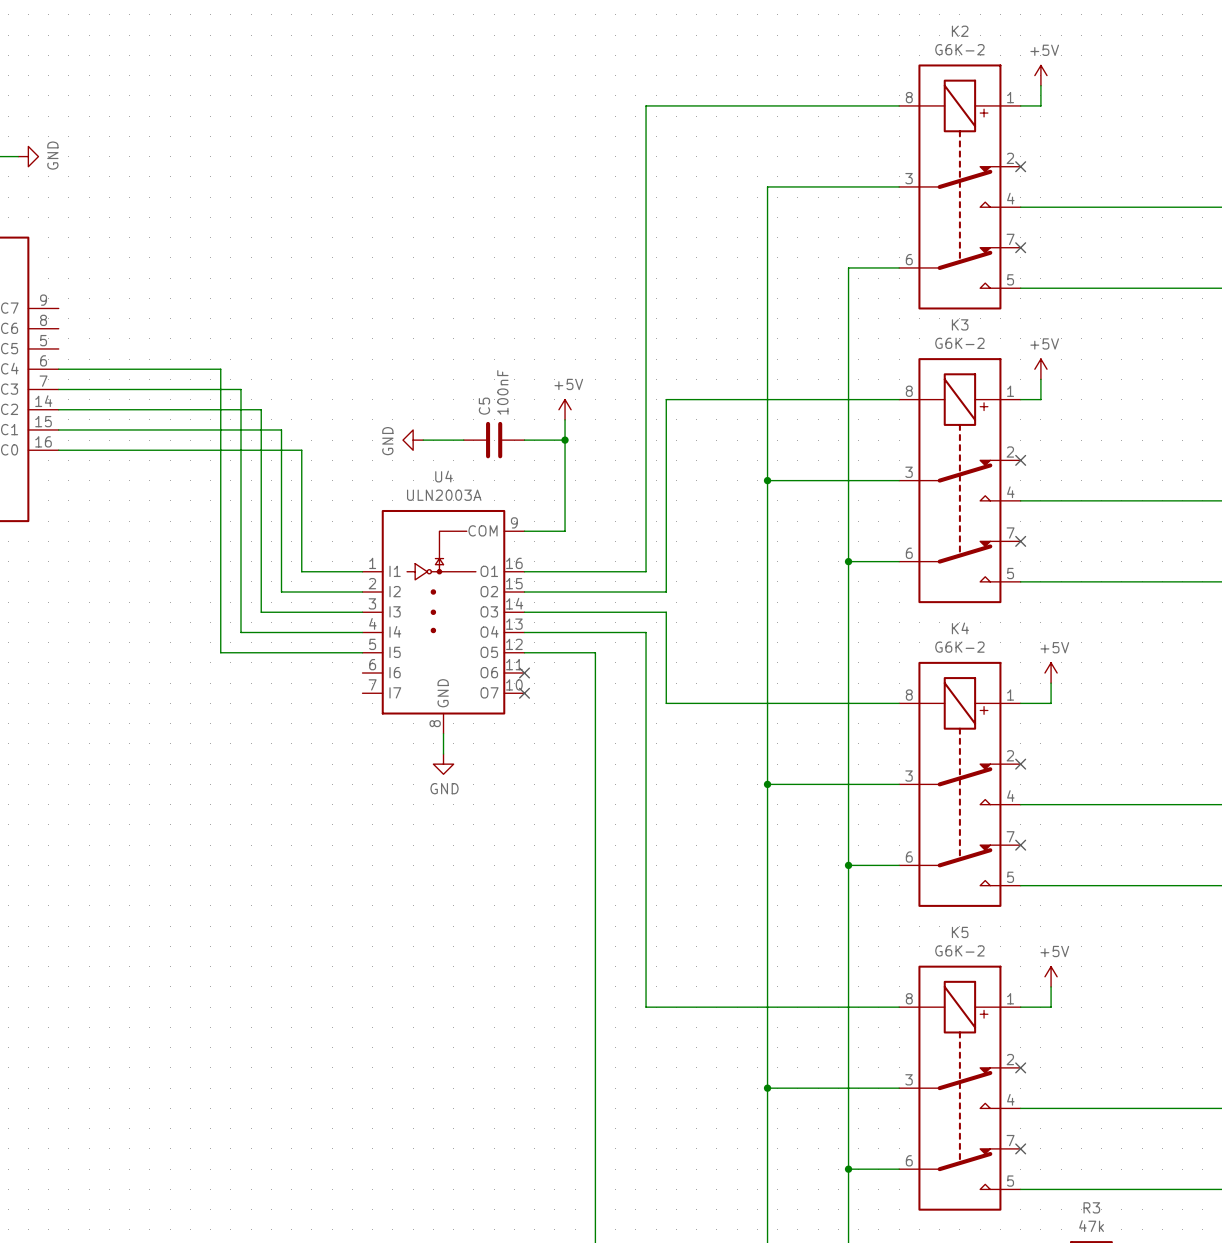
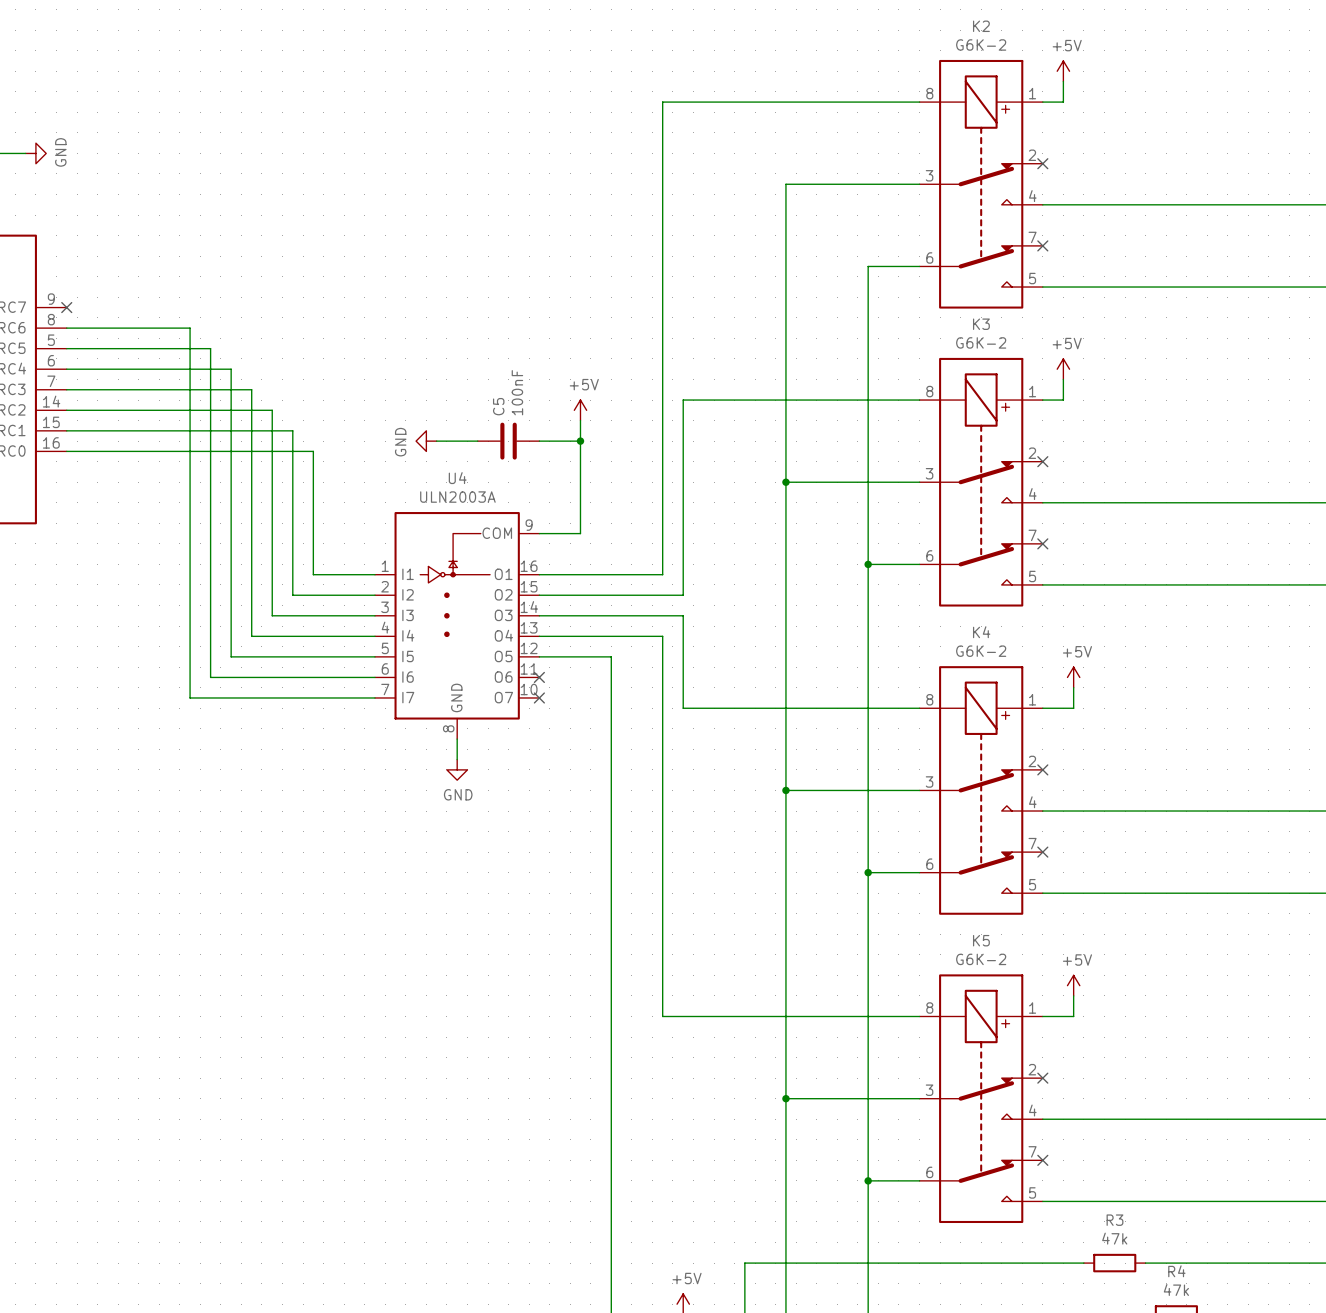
no-connect mark: none -> (66, 307)
wire: none -> (66, 328) (190, 328) (190, 697) (374, 697)
wire: none -> (66, 348) (210, 348) (210, 677) (374, 677)

